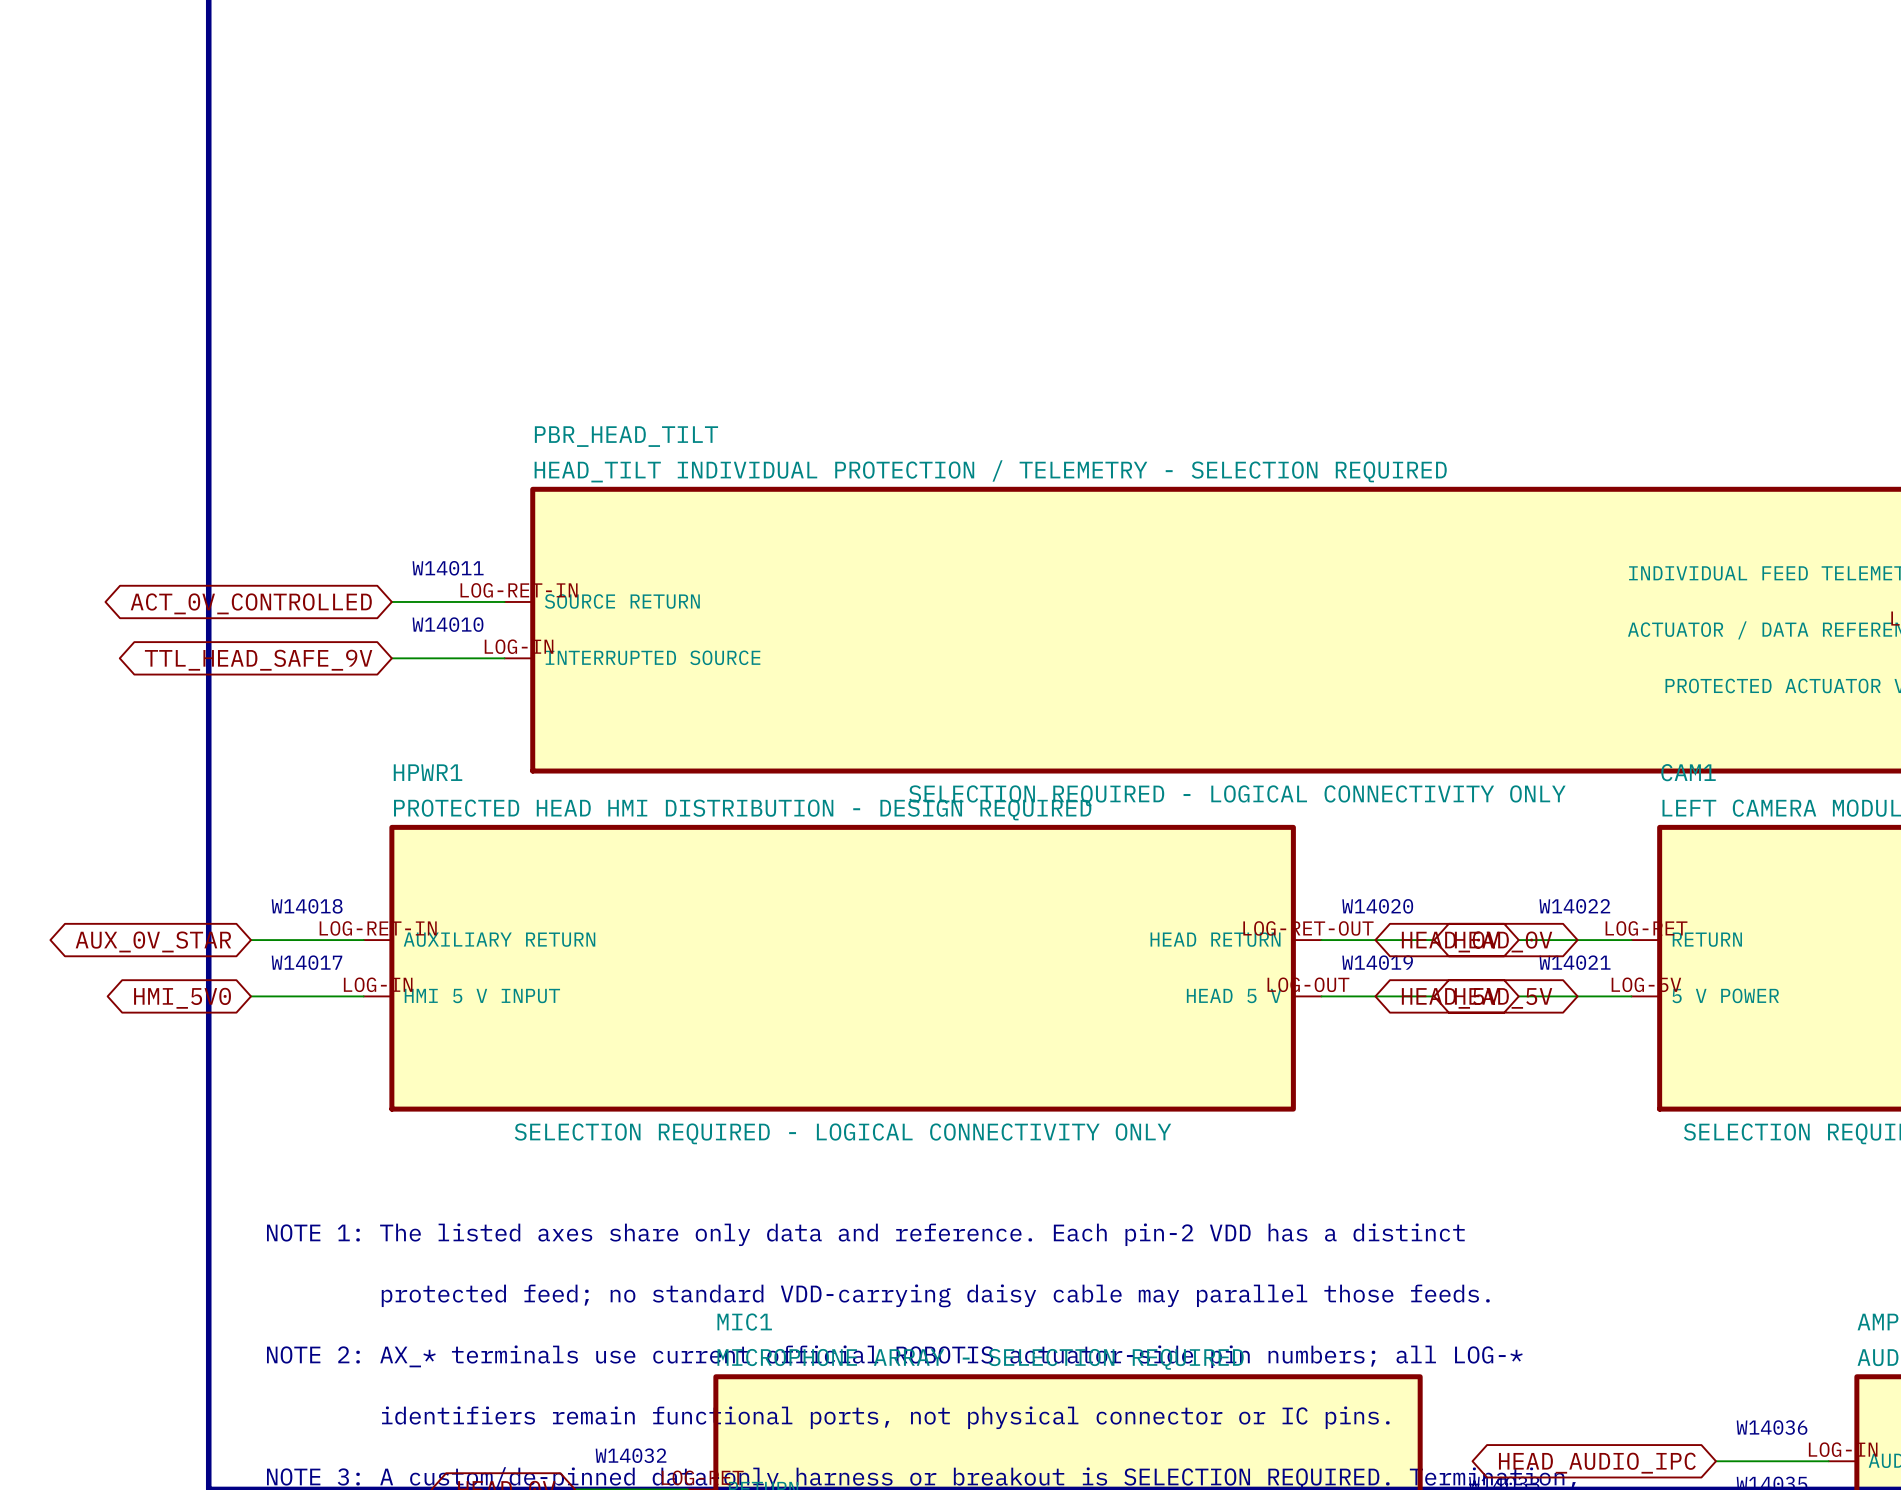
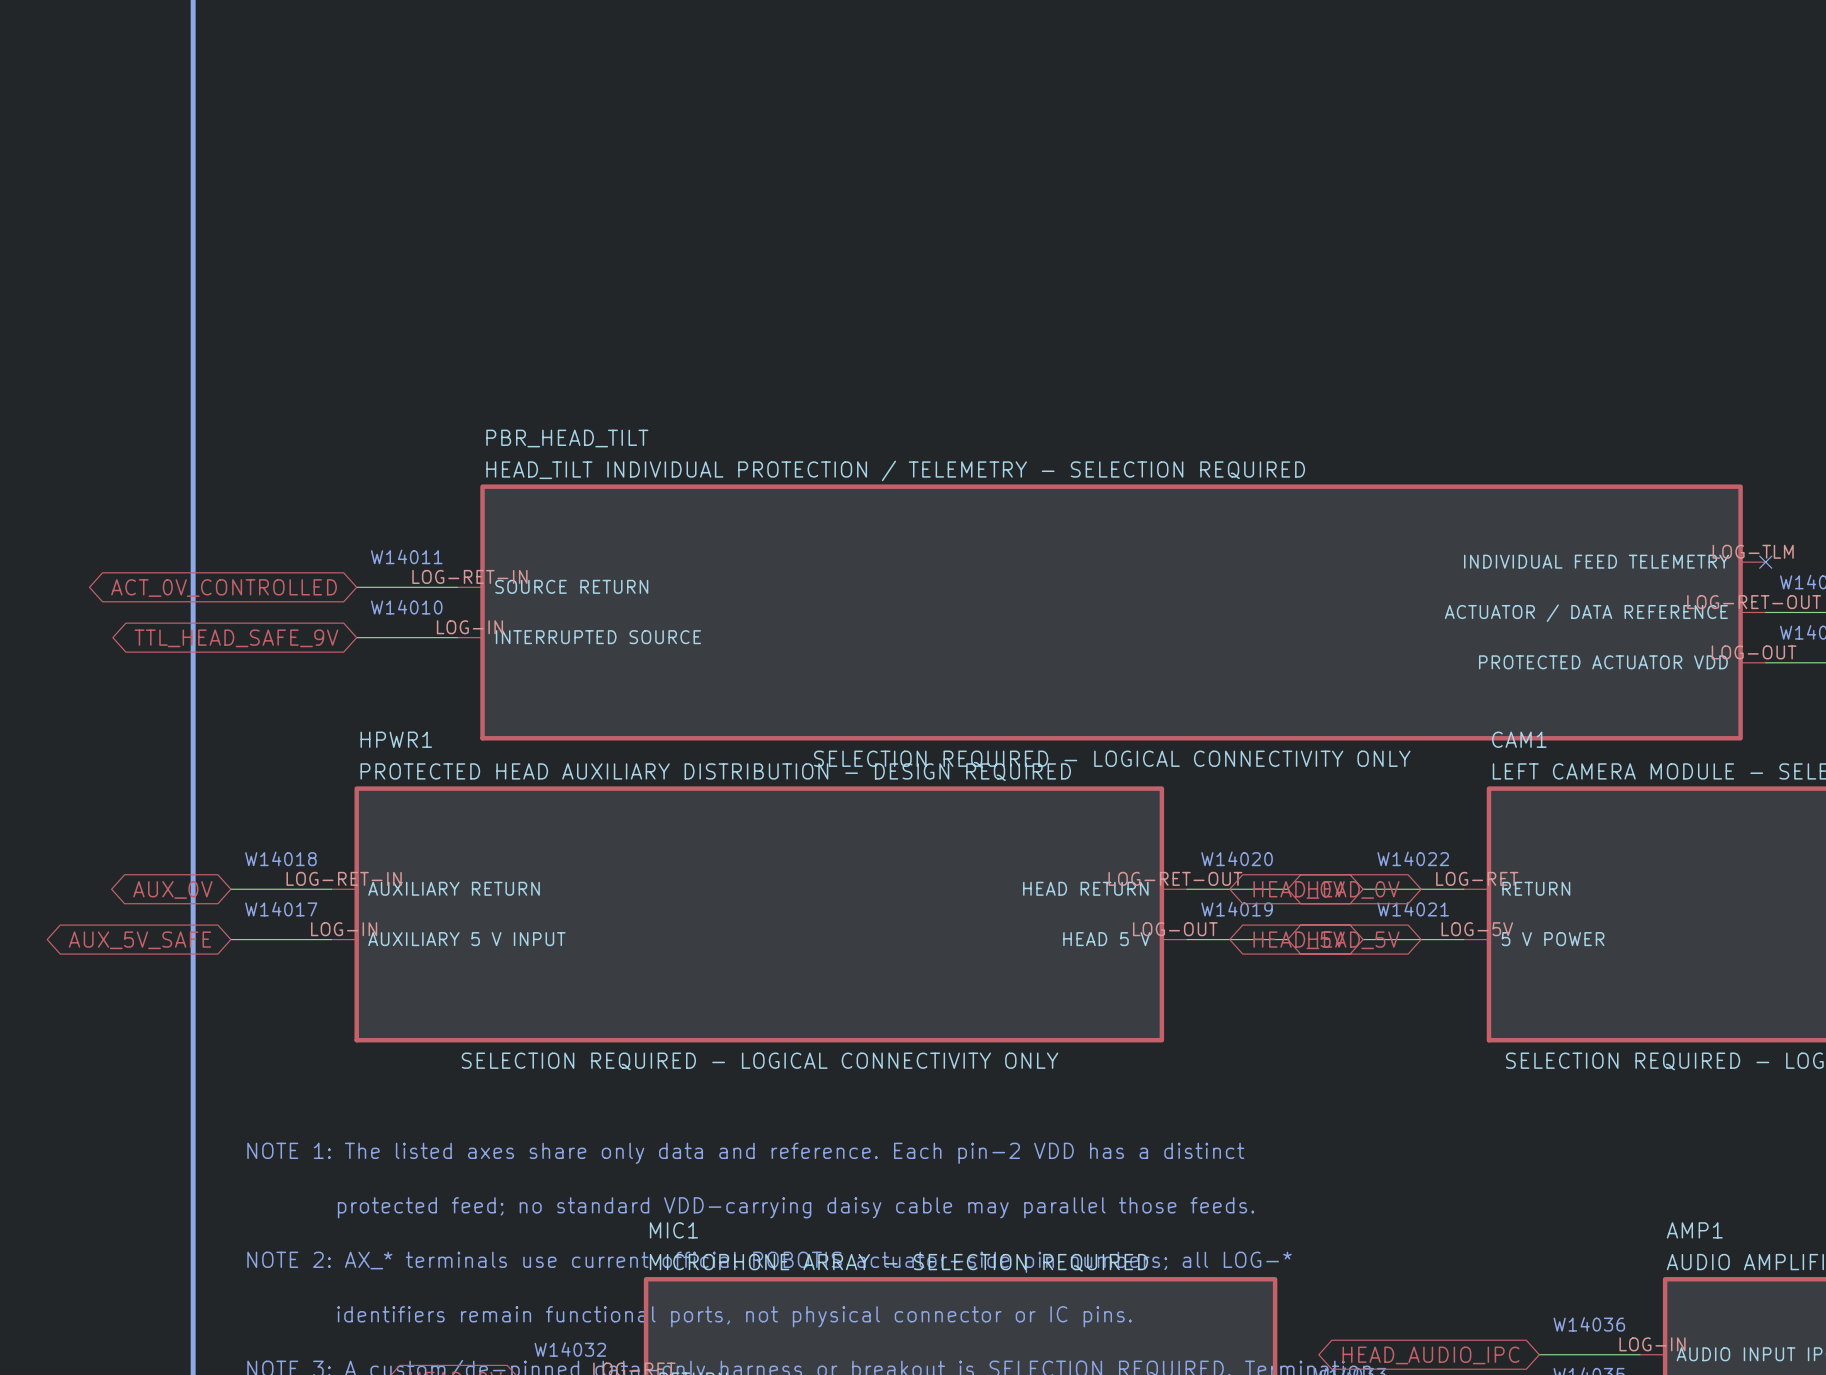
HPWR1 text: PROTECTED HEAD HMI DISTRIBUTION - DESIGN REQUIRED (742, 809) -> PROTECTED HEAD AUXILIARY DISTRIBUTION - DESIGN REQUIRED (715, 772)
global label: AUX_0V_STAR (153, 941) -> AUX_0V (172, 889)
HPWR1 pin name: HMI 5 V INPUT (482, 996) -> AUXILIARY 5 V INPUT (466, 939)
global label: HMI_5V0 (182, 998) -> AUX_5V_SAFE (139, 940)

